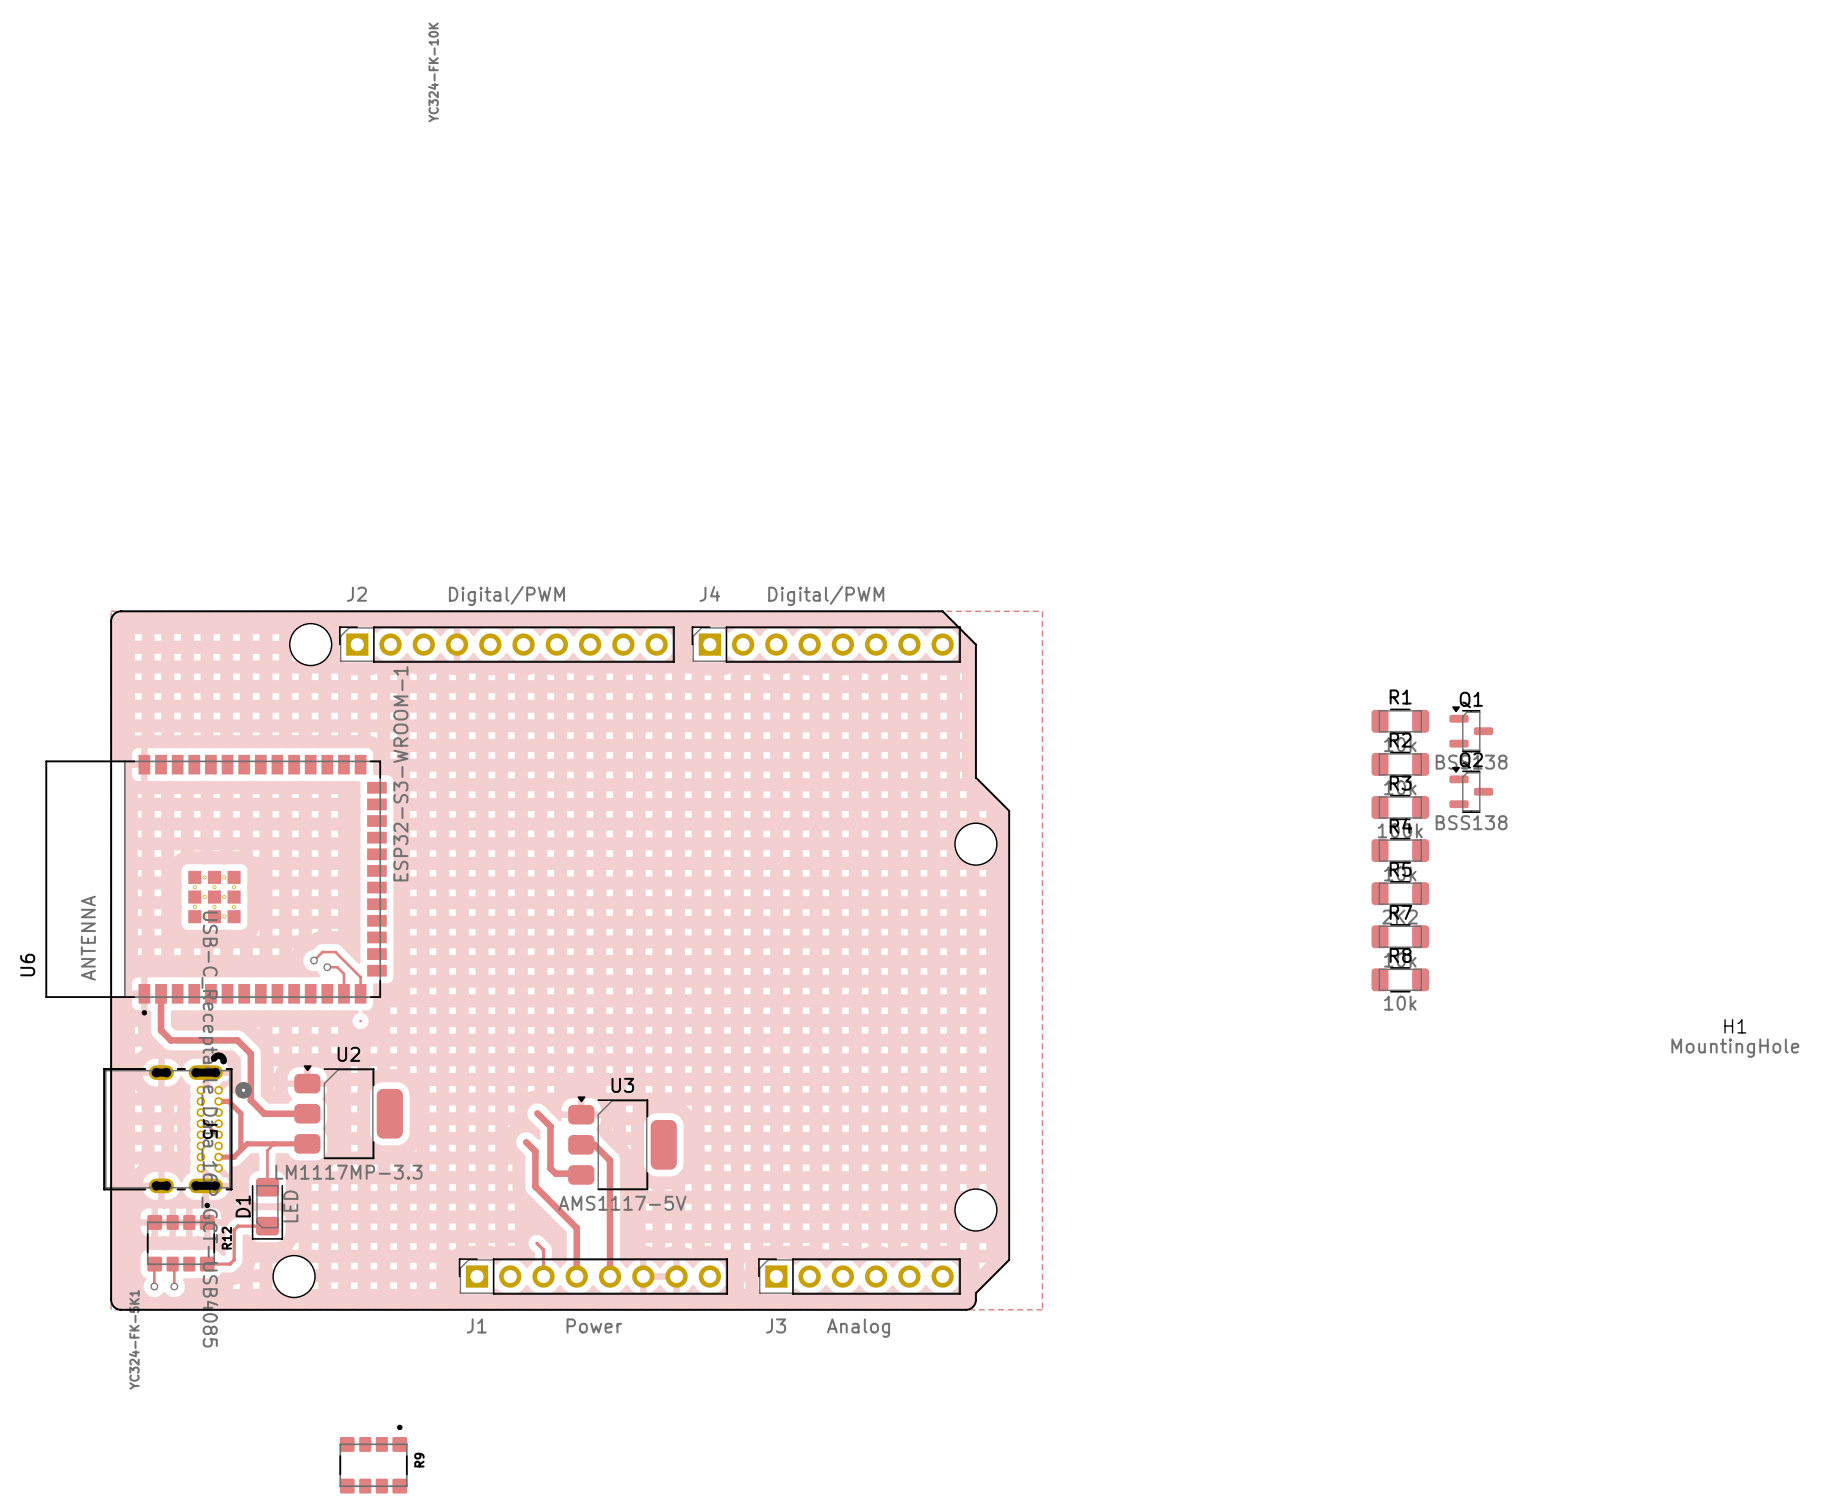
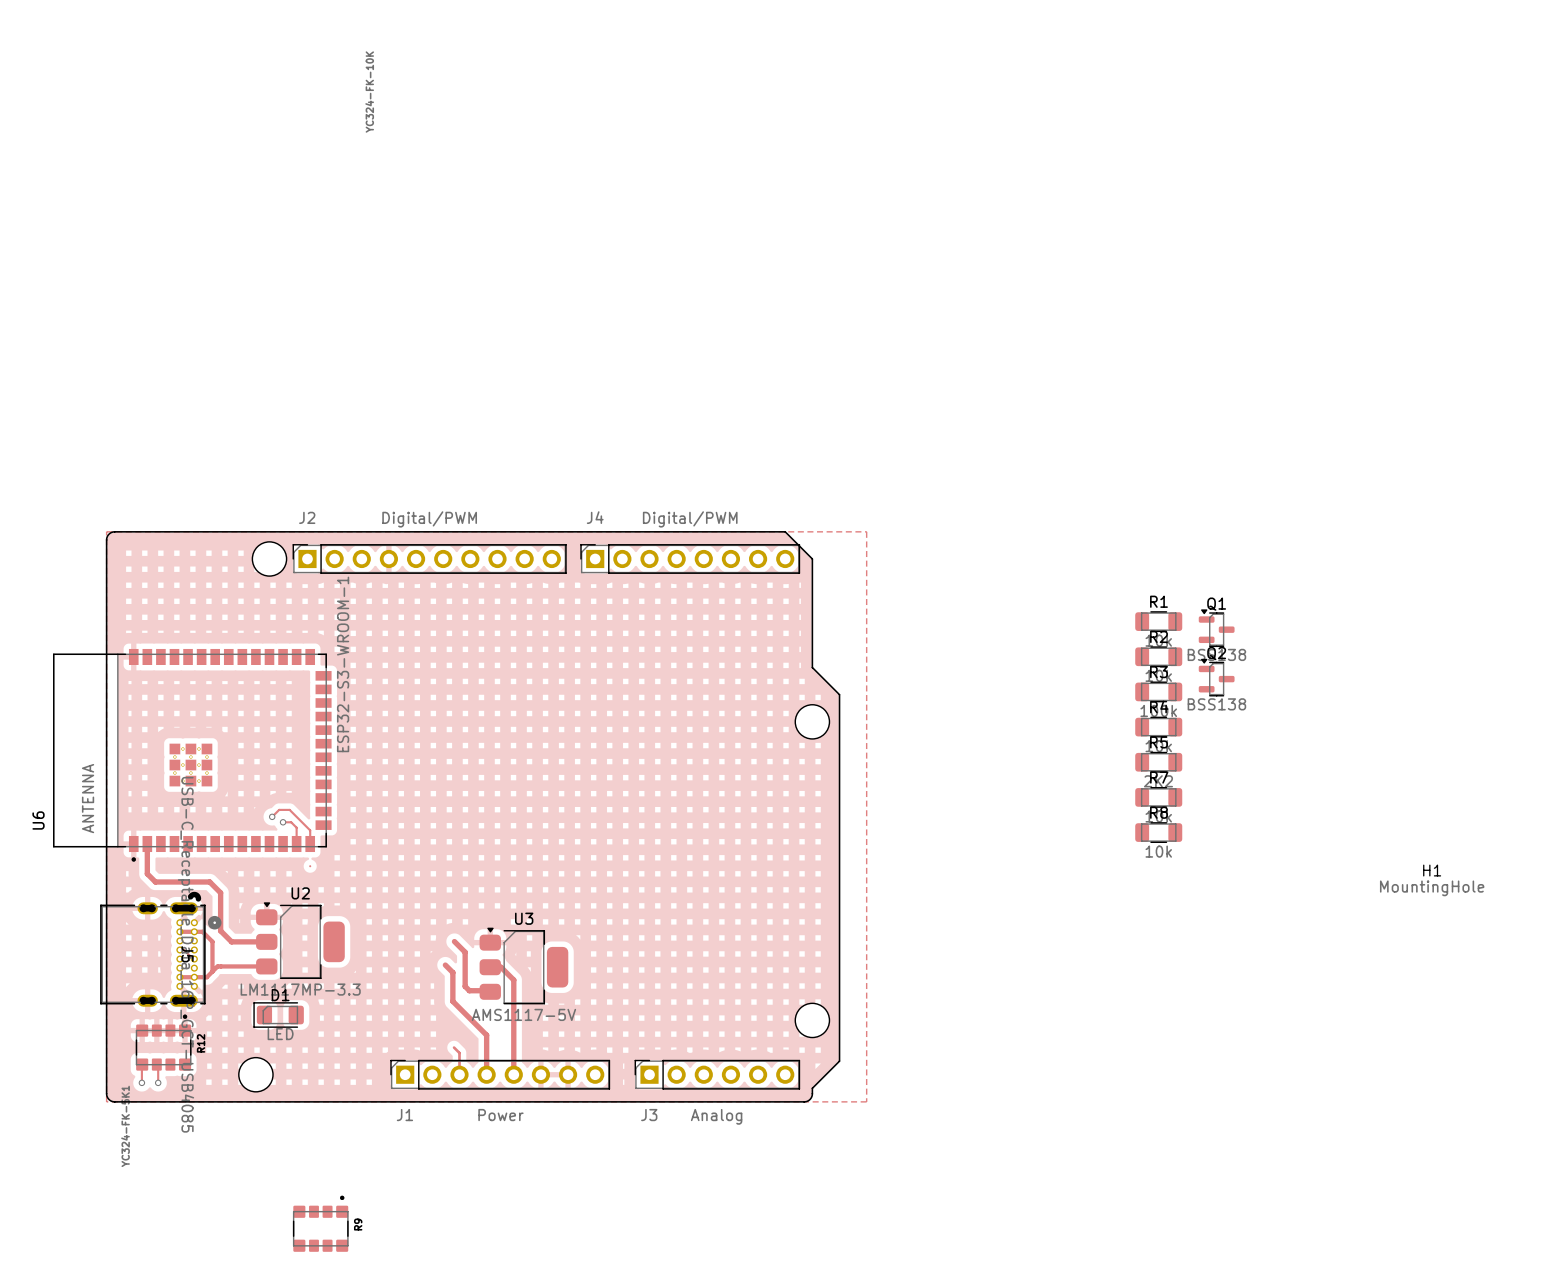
track: none -> (179, 931) (194, 931)
track: (274, 1143) (267, 1150) (267, 1187) -> none
track: none -> (179, 977) (194, 977)
D1 rotation: 0° (267, 1208) -> 90° clockwise (278, 1015)
D1 position: (267, 1208) -> (278, 1015)
track: (267, 1226) (237, 1226) (234, 1229) (234, 1259) (230, 1264) (207, 1264) -> none

